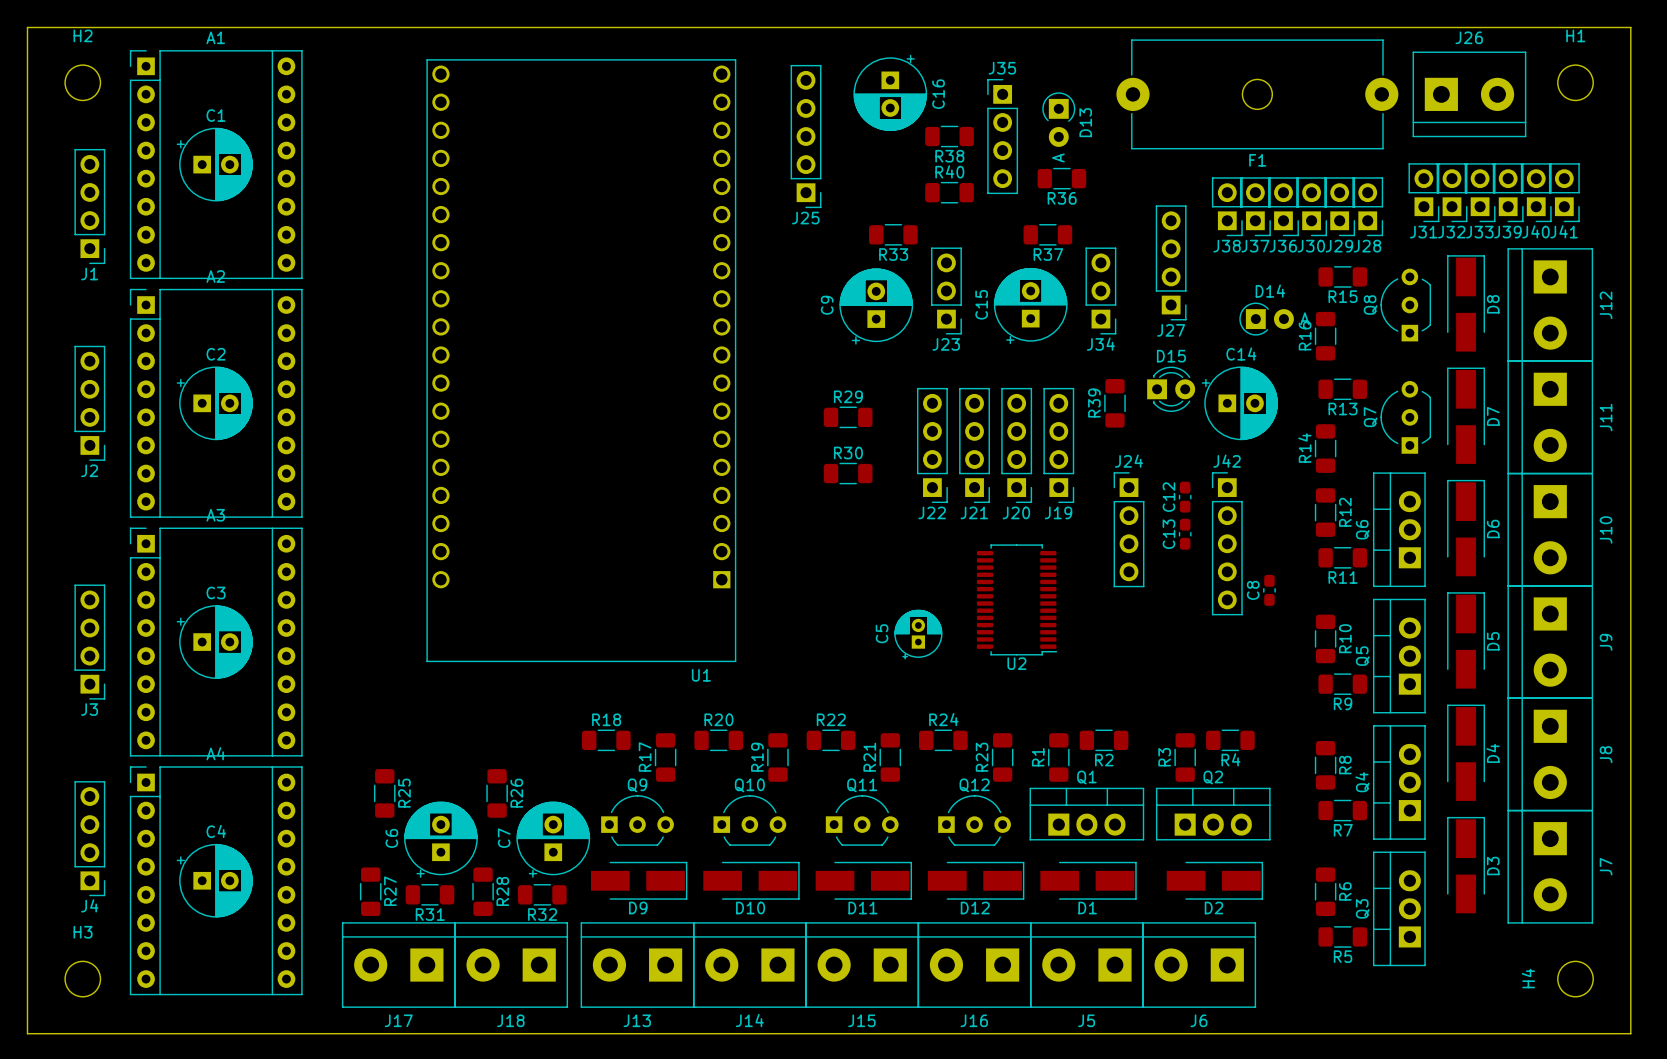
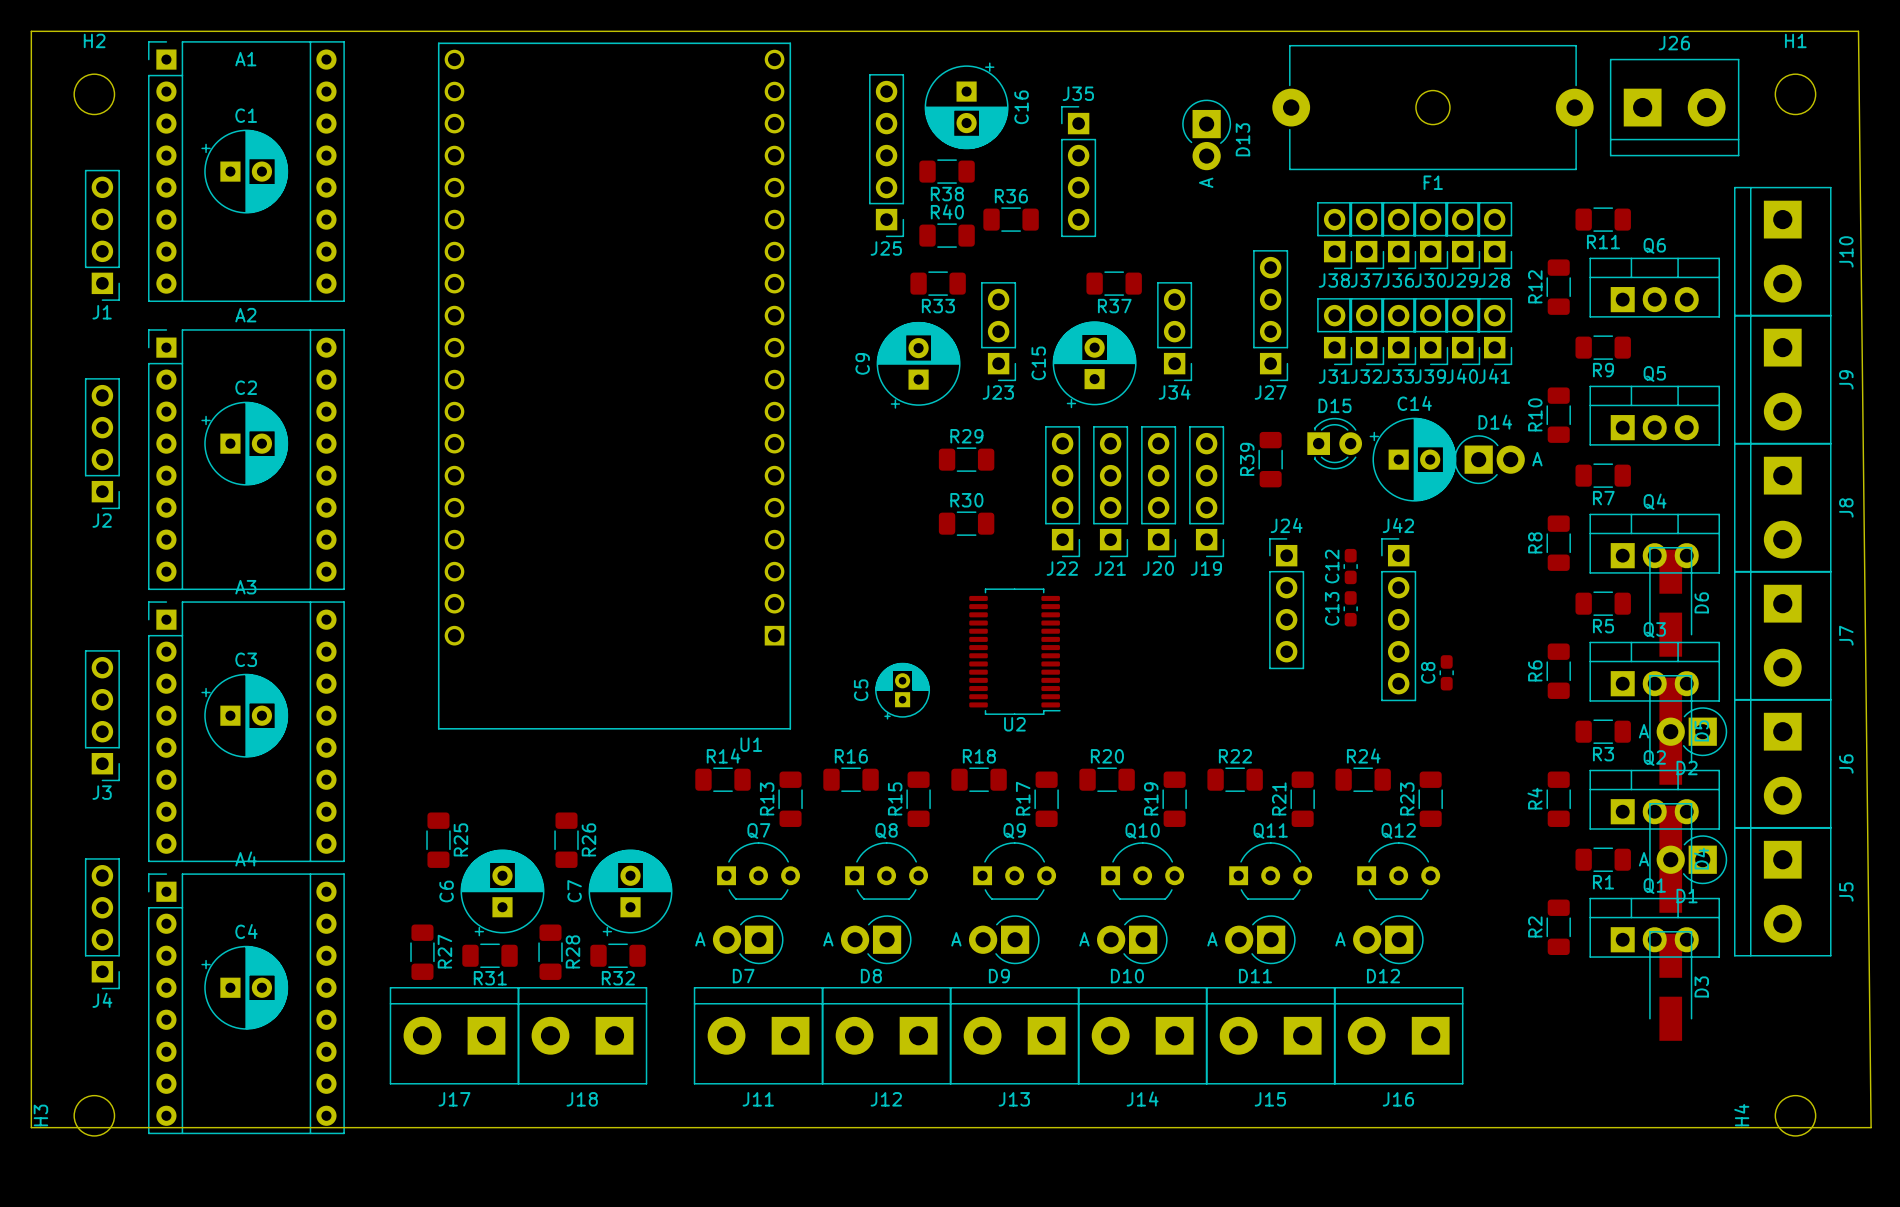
board edge: (1630, 27) (1630, 1033) (27, 1033) (27, 989) -> (1858, 31) (1871, 1127) (31, 1127)
A1 name position: A1 (215, 37) -> A1 (245, 59)
C16 position: (890, 92) -> (966, 105)
D13 footprint: [1042, 92, 1076, 147] -> [1182, 99, 1232, 171]
J25 position: (806, 136) -> (886, 155)
R38 position: (949, 136) -> (947, 171)
J35 position: (1002, 136) -> (1078, 171)
C1 position: (214, 164) -> (244, 171)
A1 position: (216, 164) -> (246, 171)
R36 position: (1061, 178) -> (1011, 219)
R40 position: (949, 192) -> (947, 235)
J31 position: (1423, 192) -> (1334, 331)
J32 position: (1451, 192) -> (1366, 331)
J33 position: (1480, 192) -> (1398, 331)
J39 position: (1508, 192) -> (1430, 331)
J40 position: (1536, 192) -> (1462, 331)
J41 position: (1564, 192) -> (1494, 331)
R36 name position: R36 (1062, 198) -> R36 (1011, 196)
J38: none -> (1334, 235)
J37: none -> (1366, 235)
J29: (1339, 206) -> none
J28: (1367, 206) -> none
R33 position: (893, 234) -> (938, 283)
R37 position: (1047, 234) -> (1114, 283)
J38 name: J38 (1227, 246) -> J36 (1398, 280)
J37 name: J37 (1255, 246) -> J30 (1430, 280)
J36 name: J36 (1283, 246) -> J29 (1462, 280)
J30 name: J30 (1311, 246) -> J28 (1494, 280)
D8 footprint: [1447, 255, 1485, 352] -> [840, 915, 912, 965]
J27 position: (1171, 262) -> (1270, 315)
R15 rotation: 0° (1342, 276) -> 90° clockwise (918, 799)
R15 position: (1342, 276) -> (918, 799)
J23 position: (946, 290) -> (998, 331)
J34 position: (1100, 290) -> (1174, 331)
D14 footprint: [1239, 302, 1294, 336] -> [1454, 435, 1525, 485]
D8 name position: D8 (1493, 304) -> D8 (871, 976)
Q8 rotation: 0° (1405, 305) -> 90° clockwise (886, 871)
Q8 position: (1405, 305) -> (886, 871)
J12 rotation: 0° (1550, 305) -> 90° clockwise (886, 1035)
J12 position: (1550, 305) -> (886, 1035)
C9 position: (876, 306) -> (918, 365)
C15 position: (1030, 306) -> (1094, 364)
R16 rotation: 0° (1325, 336) -> 90° clockwise (851, 779)
R16 position: (1325, 336) -> (851, 779)
U1 position: (581, 360) -> (614, 386)
D7 footprint: [1447, 367, 1485, 464] -> [712, 915, 784, 965]
R13 rotation: 0° (1342, 389) -> 90° clockwise (790, 799)
R13 position: (1342, 389) -> (790, 799)
J2 position: (89, 403) -> (102, 443)
C2 position: (214, 403) -> (244, 443)
D7 name position: D7 (1493, 416) -> D7 (743, 976)
R29 position: (848, 417) -> (966, 459)
Q7 rotation: 0° (1405, 417) -> 90° clockwise (758, 871)
Q7 position: (1405, 417) -> (758, 871)
J11 rotation: 0° (1550, 417) -> 90° clockwise (758, 1035)
J11 position: (1550, 417) -> (758, 1035)
J22 position: (932, 445) -> (1062, 491)
J21 position: (974, 445) -> (1110, 491)
J20 position: (1016, 445) -> (1158, 491)
J19 position: (1058, 445) -> (1206, 491)
R14 rotation: 0° (1325, 448) -> 90° clockwise (723, 779)
R14 position: (1325, 448) -> (723, 779)
R30 position: (848, 473) -> (966, 523)
R12 position: (1325, 512) -> (1558, 287)
R12 name position: R12 (1345, 512) -> R12 (1535, 286)
Q6 rotation: 0° (1399, 529) -> 90° clockwise (1654, 287)
Q6 position: (1399, 529) -> (1654, 287)
J10 position: (1550, 529) -> (1782, 251)
R11 position: (1342, 557) -> (1603, 219)
U2 position: (1017, 599) -> (1014, 651)
C5 position: (918, 634) -> (902, 691)
R10 position: (1325, 638) -> (1558, 415)
R10 name position: R10 (1345, 638) -> R10 (1535, 414)
J3 position: (89, 642) -> (102, 715)
C3 position: (214, 642) -> (244, 715)
J9 position: (1550, 642) -> (1782, 379)
Q5 rotation: 0° (1399, 656) -> 90° clockwise (1654, 415)
Q5 position: (1399, 656) -> (1654, 415)
R9 position: (1342, 684) -> (1603, 347)
R18 position: (606, 740) -> (979, 779)
R20 position: (718, 740) -> (1107, 779)
R22 position: (831, 740) -> (1235, 779)
R24 position: (943, 740) -> (1363, 779)
R2 rotation: 0° (1104, 740) -> 90° clockwise (1558, 927)
R2 position: (1104, 740) -> (1558, 927)
R4 rotation: 0° (1230, 740) -> 90° clockwise (1558, 799)
R4 position: (1230, 740) -> (1558, 799)
J8 position: (1550, 754) -> (1782, 507)
R17 position: (665, 757) -> (1046, 799)
R19 position: (777, 757) -> (1174, 799)
R21 position: (890, 757) -> (1302, 799)
R23 position: (1002, 757) -> (1430, 799)
R1 name position: R1 (1038, 757) -> R1 (1603, 882)
R1 rotation: 0° (1058, 757) -> 90° clockwise (1603, 859)
R1 position: (1058, 757) -> (1603, 859)
R3 name position: R3 (1164, 757) -> R3 (1603, 754)
R3 rotation: 0° (1185, 757) -> 90° clockwise (1603, 731)
R3 position: (1185, 757) -> (1603, 731)
R8 position: (1325, 765) -> (1558, 543)
R8 name position: R8 (1345, 765) -> R8 (1535, 542)
Q4 rotation: 0° (1399, 782) -> 90° clockwise (1654, 543)
Q4 position: (1399, 782) -> (1654, 543)
R25 position: (384, 793) -> (438, 840)
R26 position: (497, 793) -> (566, 840)
R7 position: (1342, 810) -> (1603, 475)
Q1 position: (1086, 814) -> (1654, 927)
Q2 position: (1213, 814) -> (1654, 799)
Q9 position: (637, 820) -> (1014, 871)
Q10 position: (749, 820) -> (1142, 871)
Q11 position: (862, 820) -> (1270, 871)
Q12 position: (974, 820) -> (1398, 871)
J4 position: (89, 838) -> (102, 923)
C6 position: (440, 839) -> (502, 892)
C7 position: (553, 839) -> (630, 892)
D9 footprint: [590, 861, 688, 900] -> [968, 915, 1040, 965]
D10 footprint: [703, 861, 800, 900] -> [1097, 915, 1168, 965]
D11 footprint: [815, 861, 912, 900] -> [1225, 915, 1296, 965]
D12 footprint: [927, 861, 1025, 900] -> [1353, 915, 1424, 965]
D1 footprint: [1040, 861, 1137, 900] -> [1656, 835, 1728, 885]
D2 footprint: [1166, 861, 1264, 900] -> [1656, 707, 1728, 757]
J7 position: (1550, 866) -> (1782, 635)
C4 position: (214, 880) -> (244, 987)
R27 position: (370, 891) -> (422, 952)
R28 position: (483, 891) -> (550, 952)
R6 position: (1325, 891) -> (1558, 671)
R6 name position: R6 (1345, 891) -> R6 (1535, 670)
R31 position: (429, 894) -> (490, 955)
R32 position: (542, 894) -> (618, 955)
Q3 rotation: 0° (1399, 908) -> 90° clockwise (1654, 671)
Q3 position: (1399, 908) -> (1654, 671)
H3 name rotation: 0° (83, 932) -> 90° counterclockwise (40, 1115)
H3 name position: H3 (83, 932) -> H3 (40, 1115)
R5 position: (1342, 936) -> (1603, 603)
J17 position: (398, 965) -> (454, 1035)
J18 position: (511, 965) -> (582, 1035)
J13 position: (637, 965) -> (1014, 1035)
J14 position: (749, 965) -> (1142, 1035)
J15 position: (862, 965) -> (1270, 1035)
J16 position: (974, 965) -> (1398, 1035)
J5 rotation: 0° (1086, 965) -> 90° counterclockwise (1782, 891)
J5 position: (1086, 965) -> (1782, 891)
J6 rotation: 0° (1199, 965) -> 90° counterclockwise (1782, 763)
J6 position: (1199, 965) -> (1782, 763)

